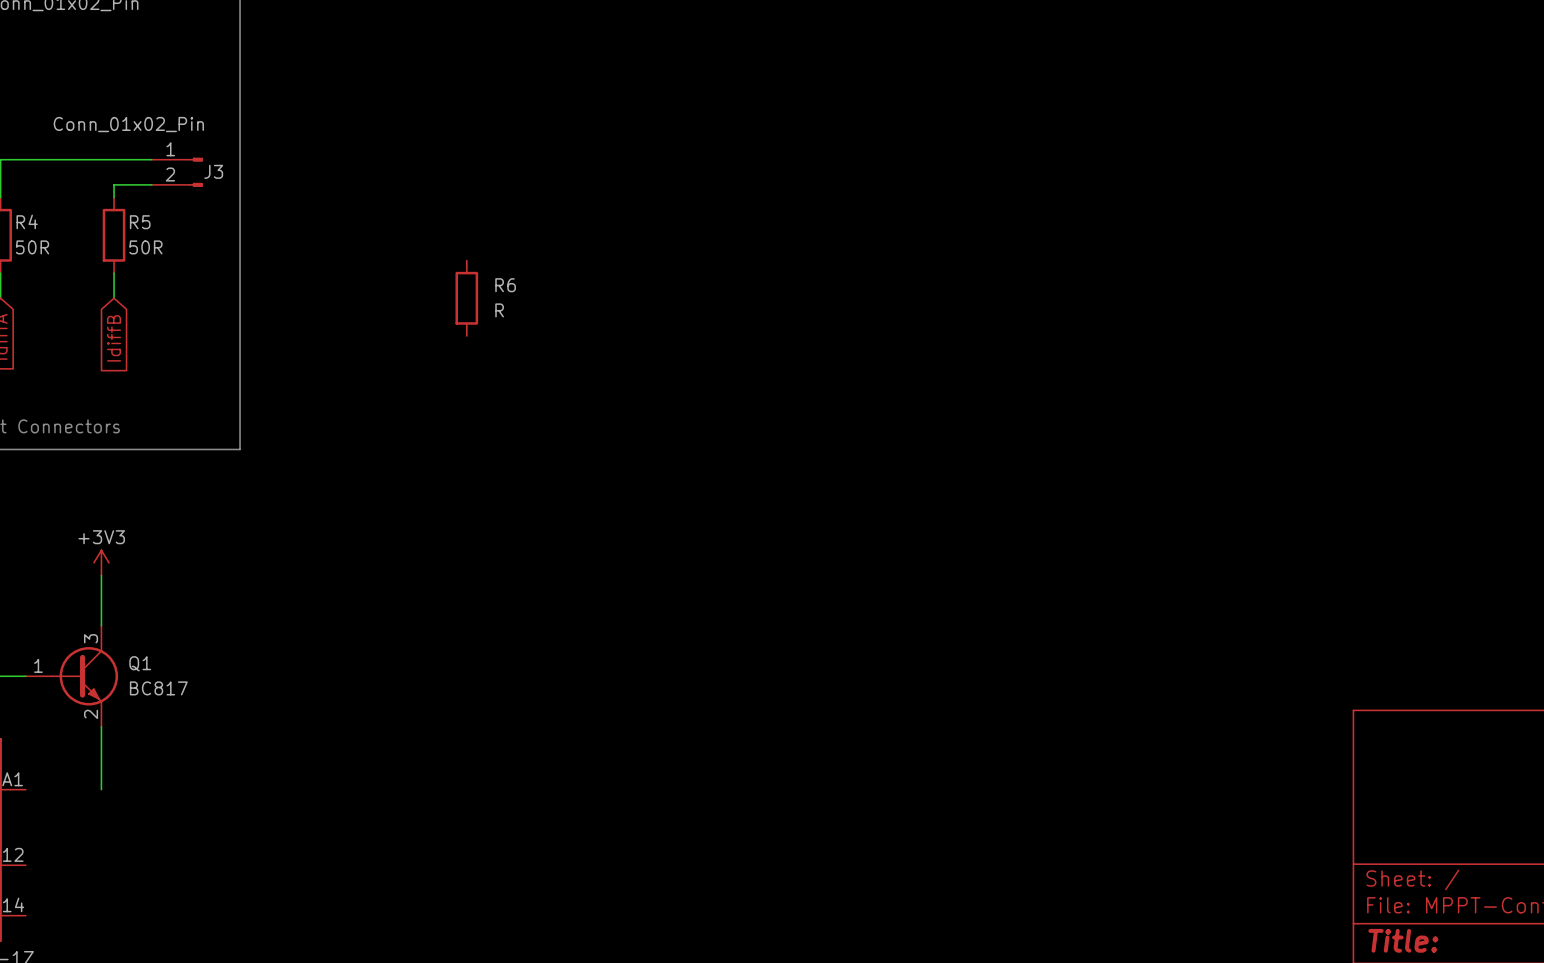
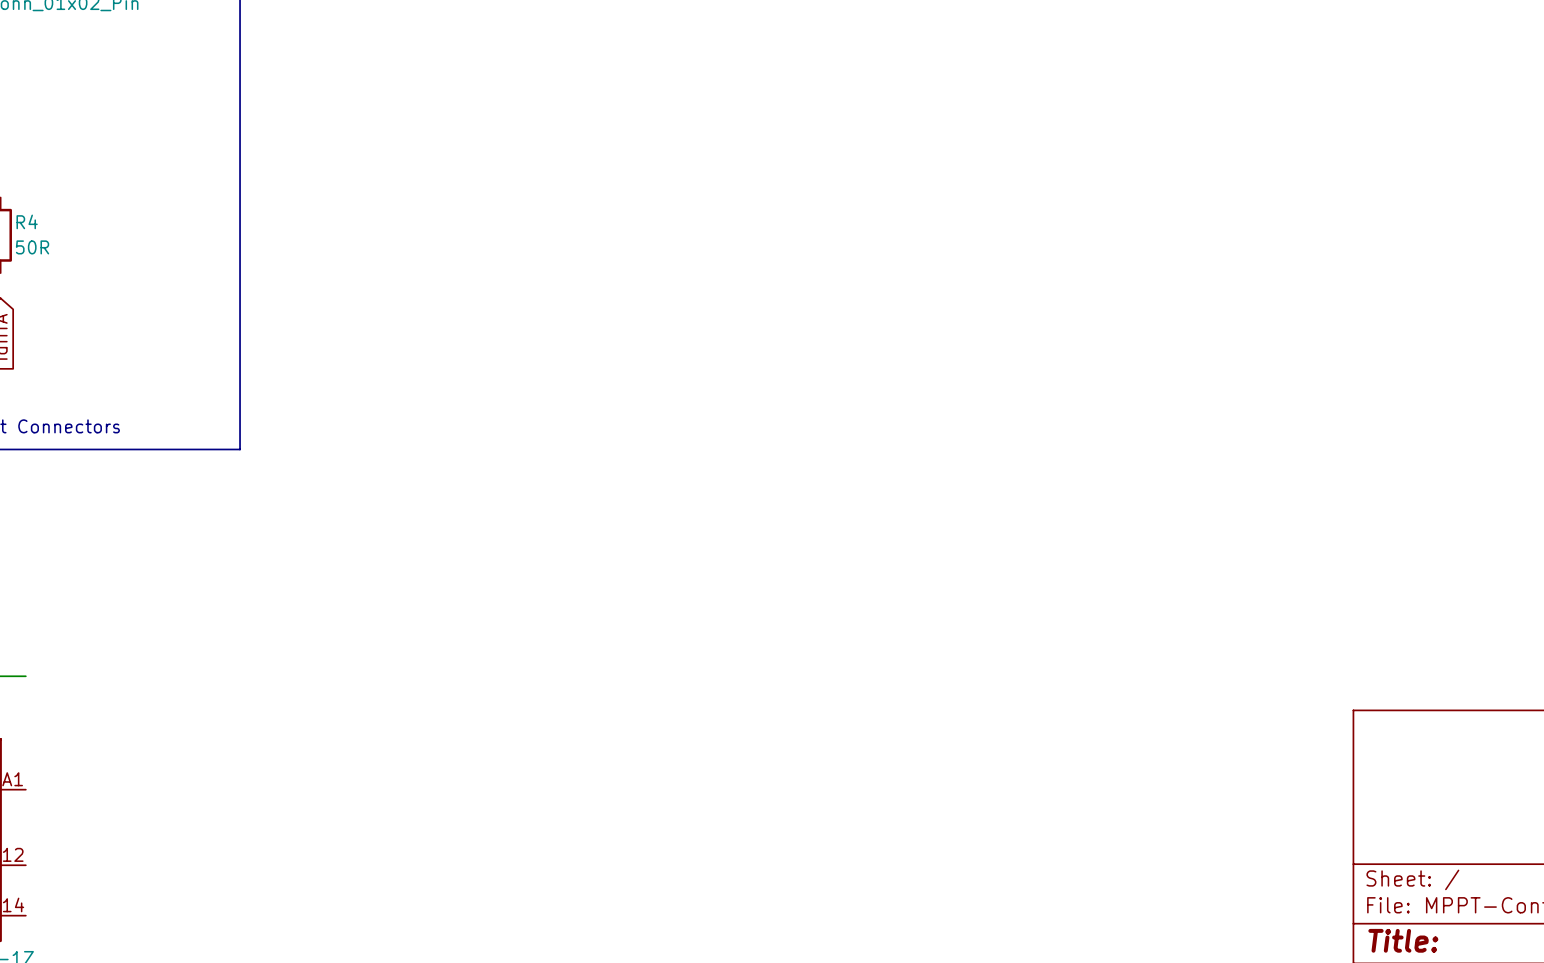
wire: (151, 159) (0, 159) (0, 197) -> none
J3: Conn_01x02_Pin (177, 172) -> none
wire: (151, 184) (114, 184) (114, 197) -> none
R5: 50R (114, 235) -> none
wire: (0, 273) (0, 298) -> none
wire: (114, 273) (114, 298) -> none
R6: R (466, 298) -> none
global label: IdiffB (114, 338) -> none
power symbol: +3V3 (101, 562) -> none
wire: (101, 575) (101, 625) -> none
Q1: BC817 (71, 676) -> none
wire: (101, 726) (101, 789) -> none

